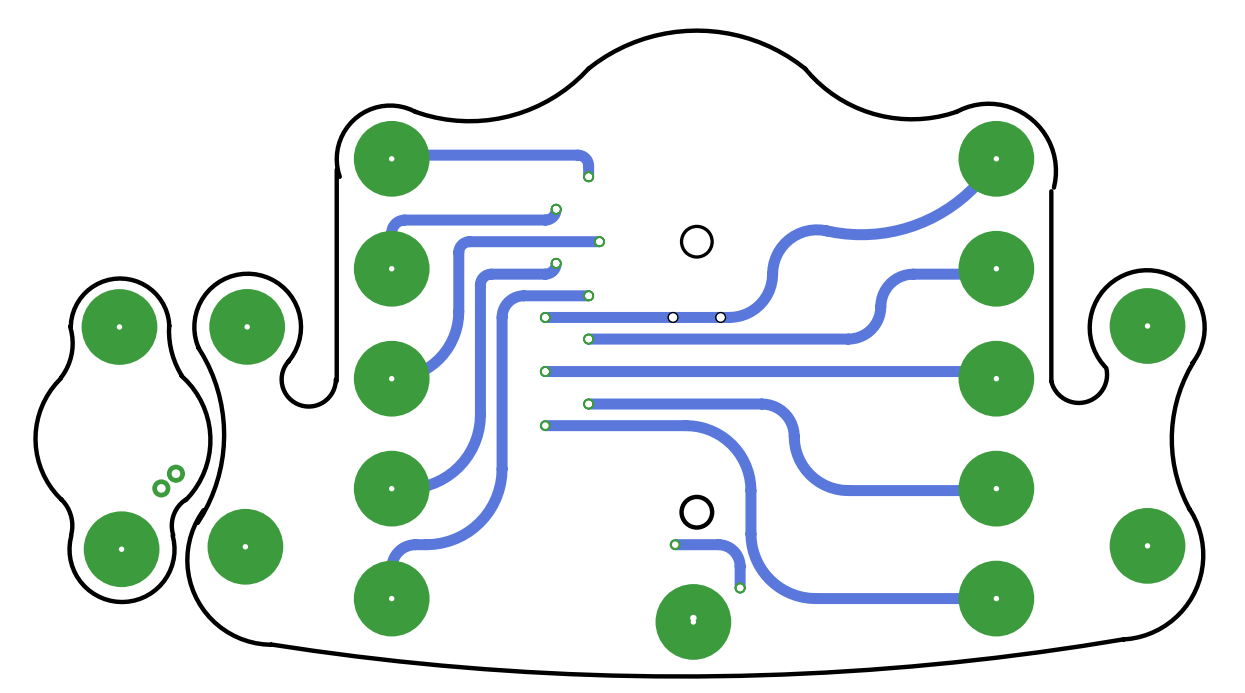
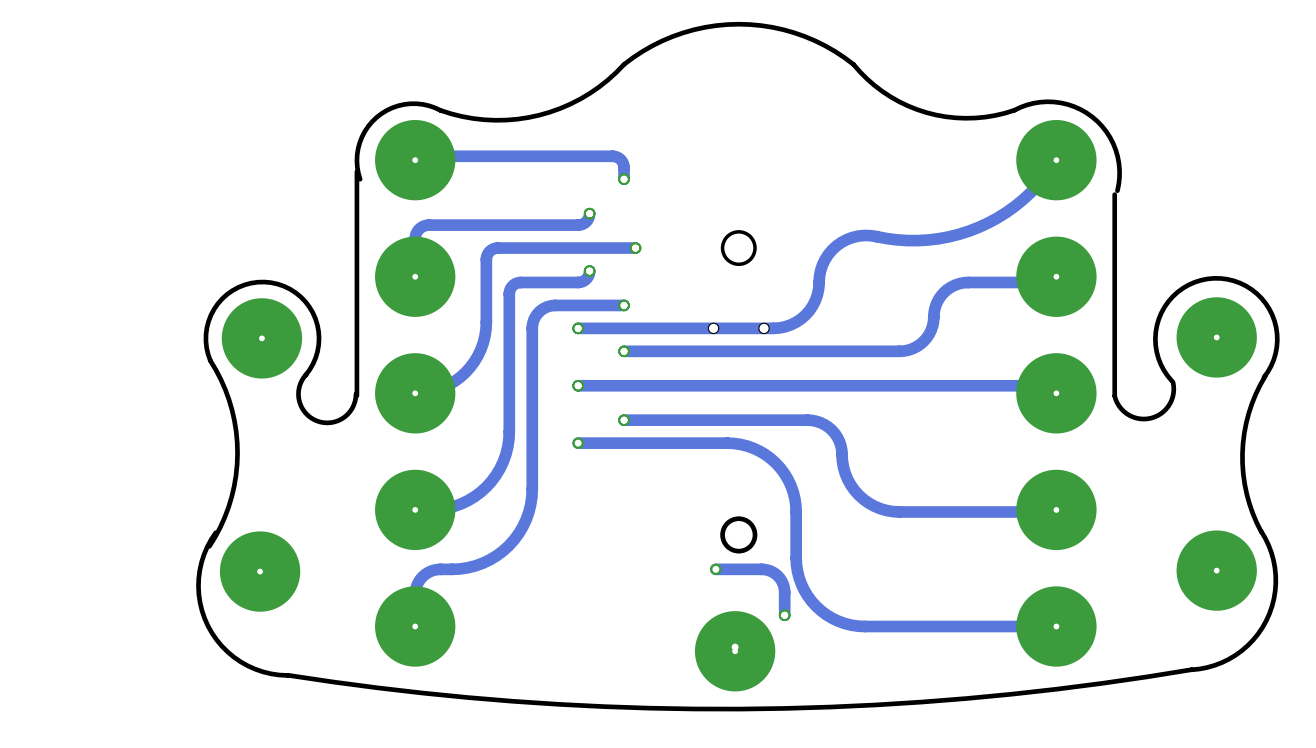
board edge: (169, 325) (171, 351) (181, 375) -> none
board edge: (70, 326) (72, 342) (71, 353) (68, 363) (60, 377) -> none
part: (119, 326) -> none
board edge: (169, 326) (165, 309) (152, 290) (137, 281) (120, 278) (97, 283) (83, 294) (74, 309) (70, 326) -> none
board edge: (181, 375) (200, 399) (208, 421) (210, 437) (205, 467) (199, 481) (185, 500) -> none
board edge: (60, 378) (46, 396) (40, 409) (35, 439) (36, 454) (43, 475) (61, 499) -> none
part: (168, 481) -> none
board edge: (61, 499) (71, 515) (71, 535) -> none
board edge: (185, 499) (177, 508) (173, 515) (171, 527) (173, 535) -> none
board edge: (172, 535) (173, 559) (163, 581) (145, 596) (122, 602) (99, 596) (80, 581) (70, 559) (71, 536) -> none
part: (121, 549) -> none

